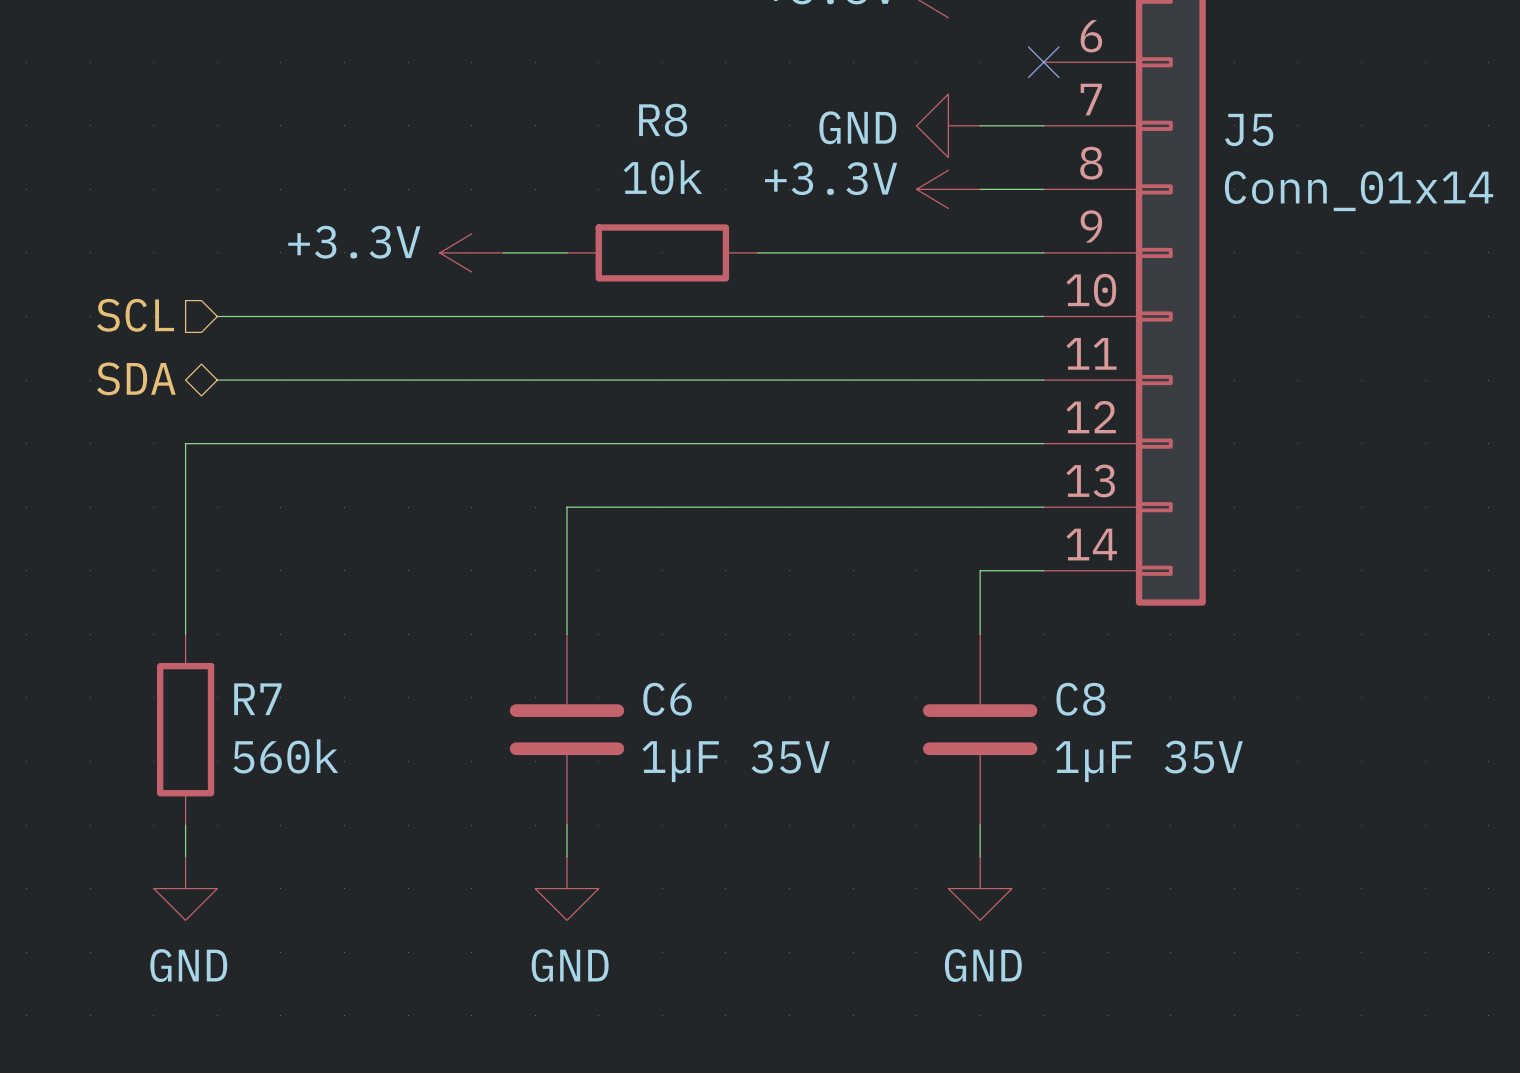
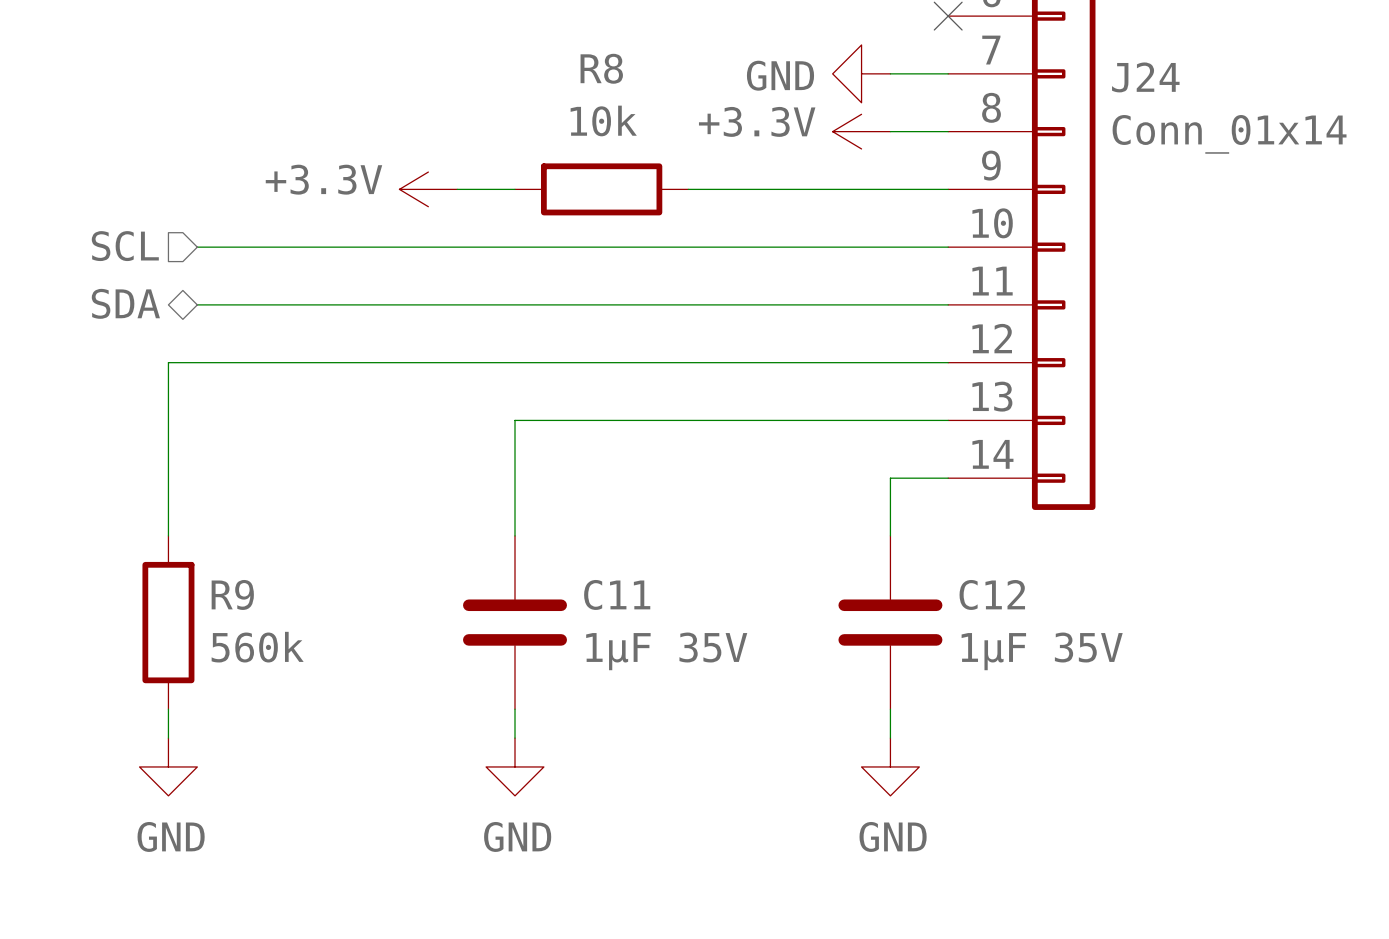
J5 name: J5 (1249, 129) -> J24 (1145, 77)
R7 name: R7 (257, 699) -> R9 (232, 594)
C6 name: C6 (667, 699) -> C11 (617, 594)
C8 name: C8 (1080, 699) -> C12 (992, 594)

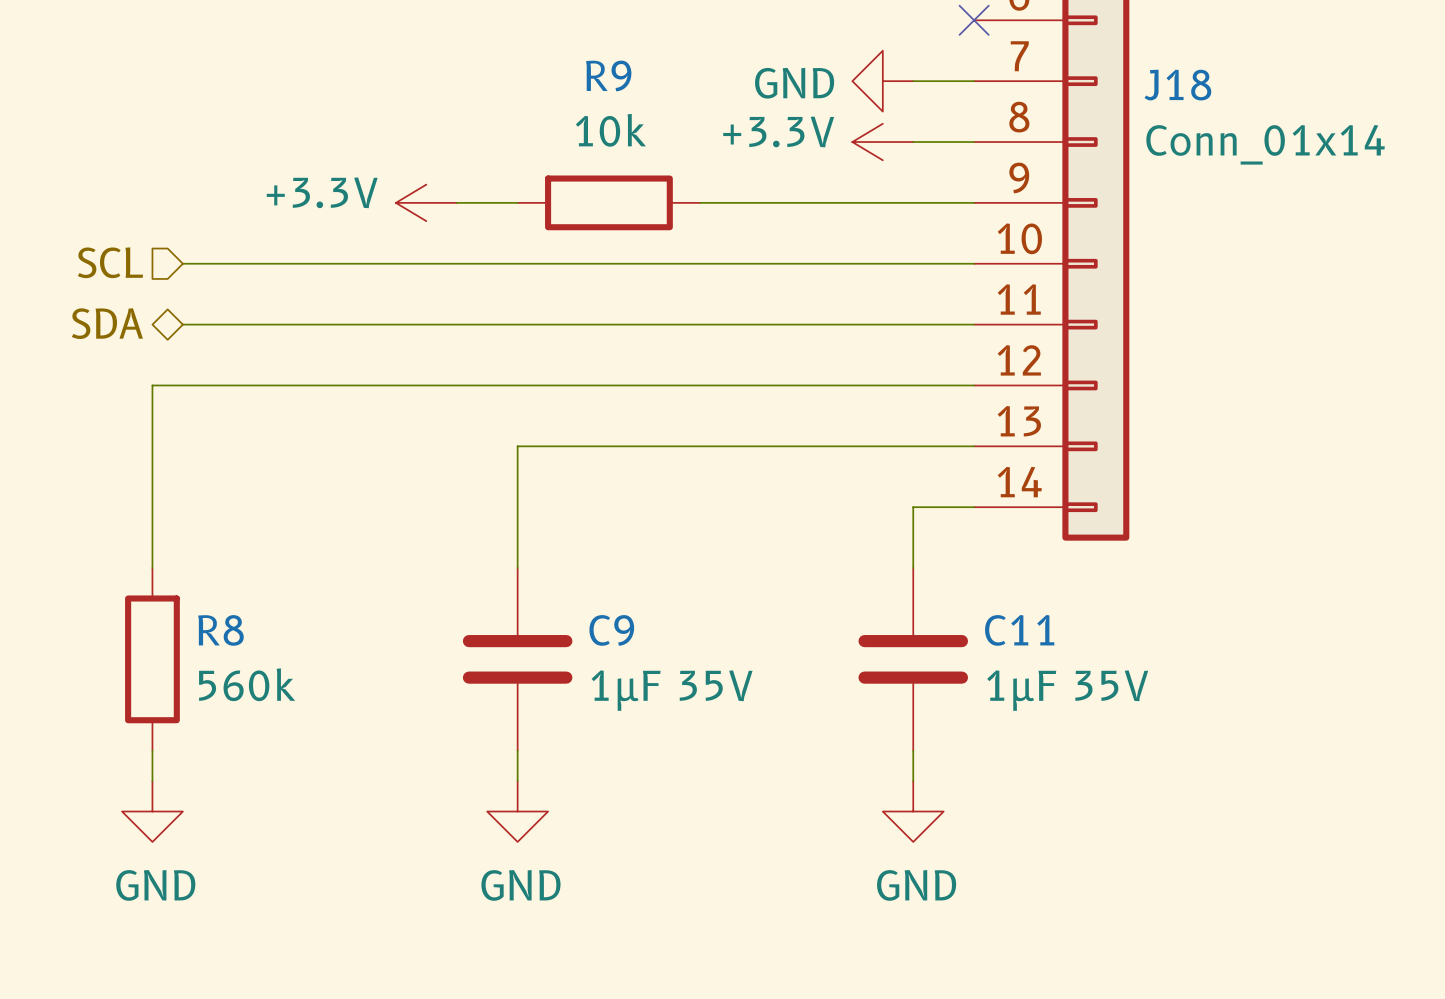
R8 name: R8 (601, 68) -> R9 (608, 75)
J24 name: J24 (1145, 77) -> J18 (1177, 85)
R9 name: R9 (232, 594) -> R8 (220, 630)
C11 name: C11 (617, 594) -> C9 (611, 630)
C12 name: C12 (992, 594) -> C11 (1019, 630)

